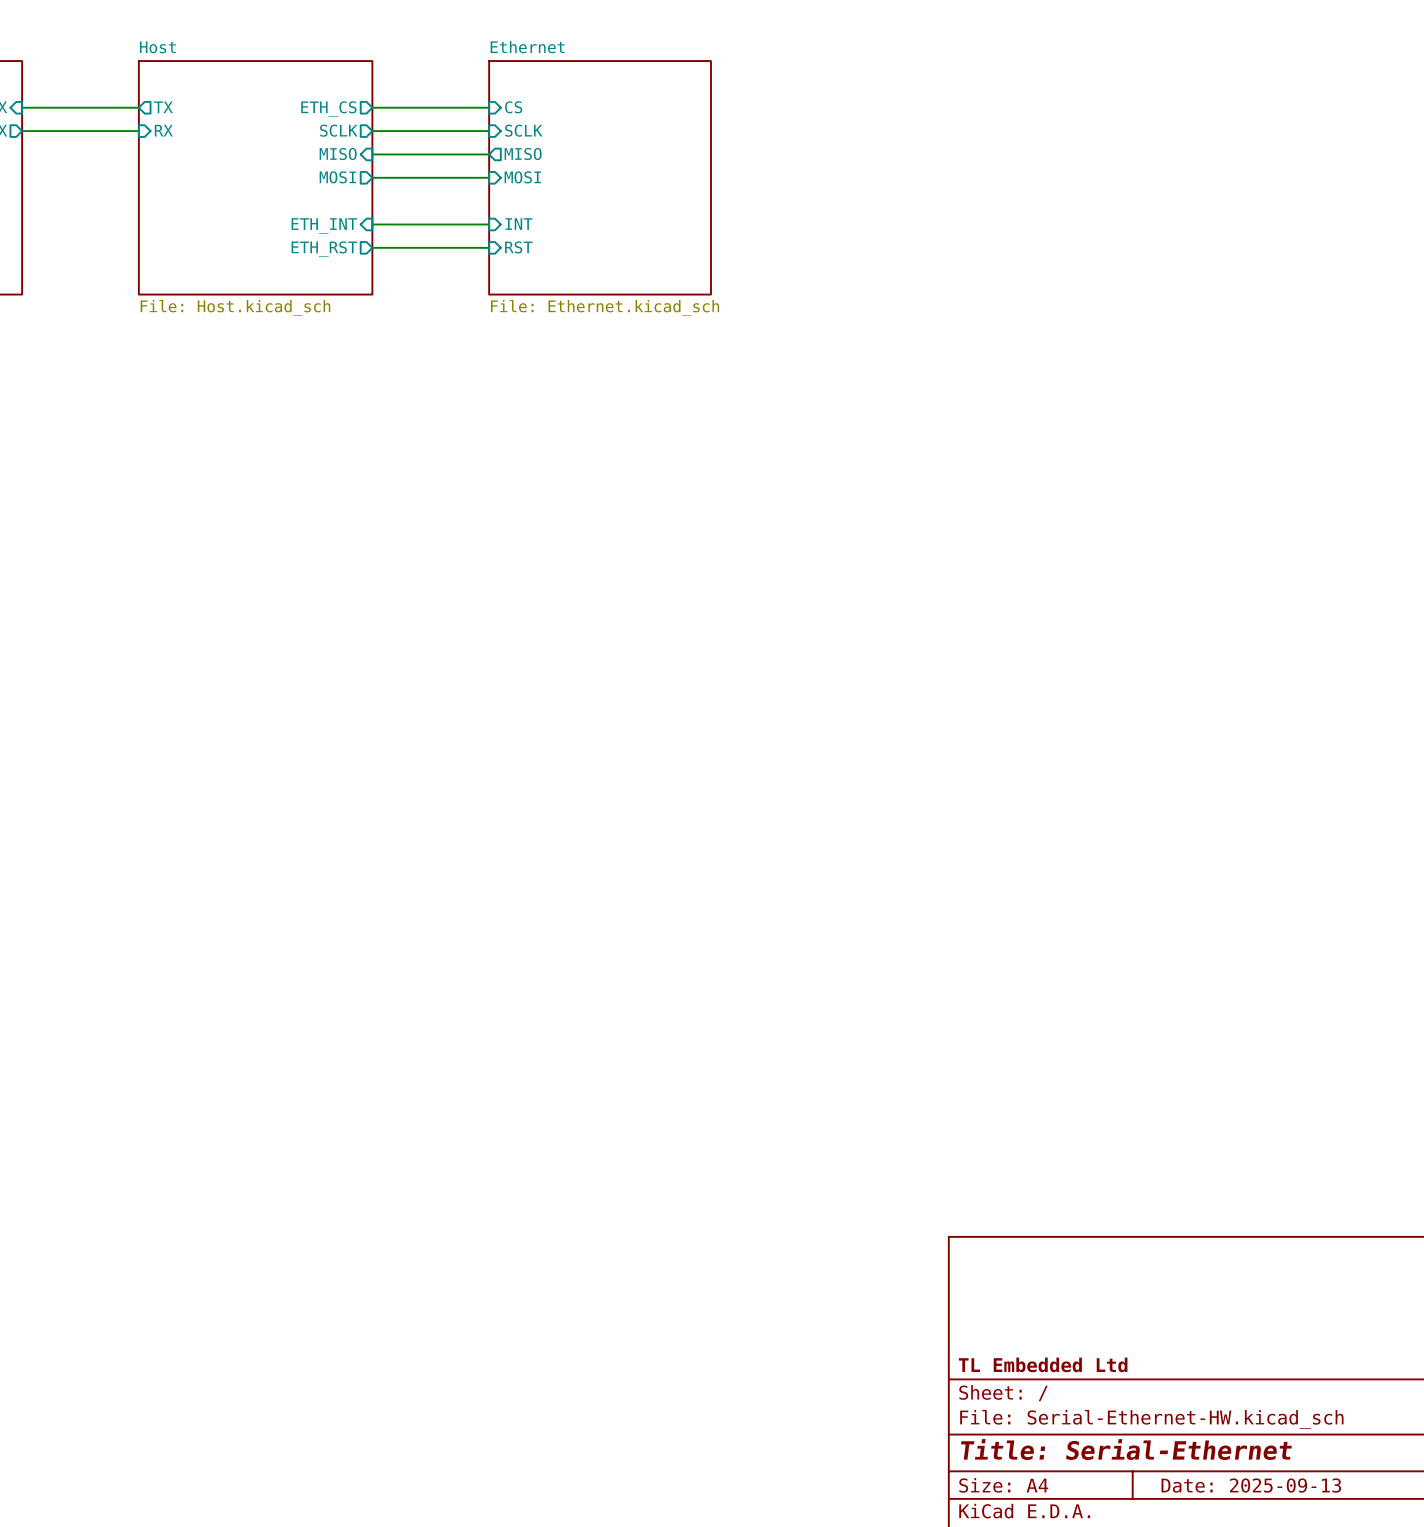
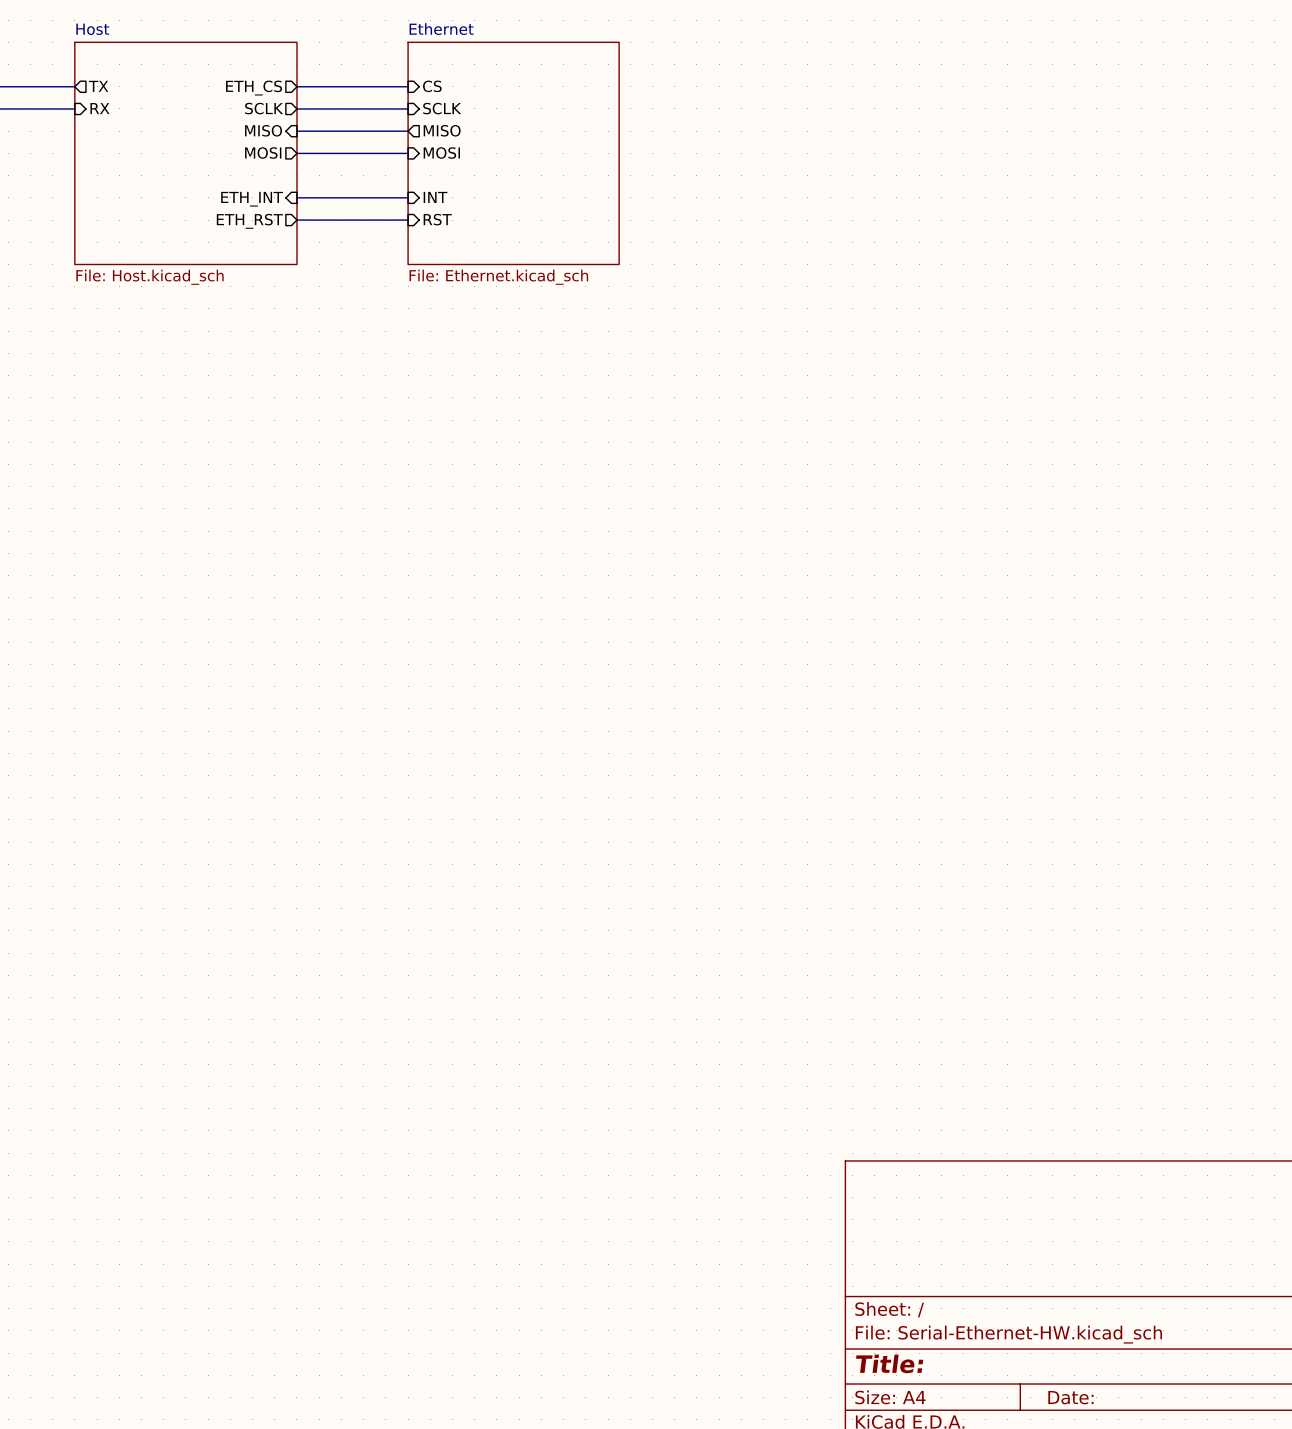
title block: TL Embedded Ltd (1043, 1364) -> none
title block: Title: Serial-Ethernet (1126, 1449) -> Title: (889, 1363)
title block: Date: 2025-09-13 (1251, 1485) -> Date: (1070, 1397)

